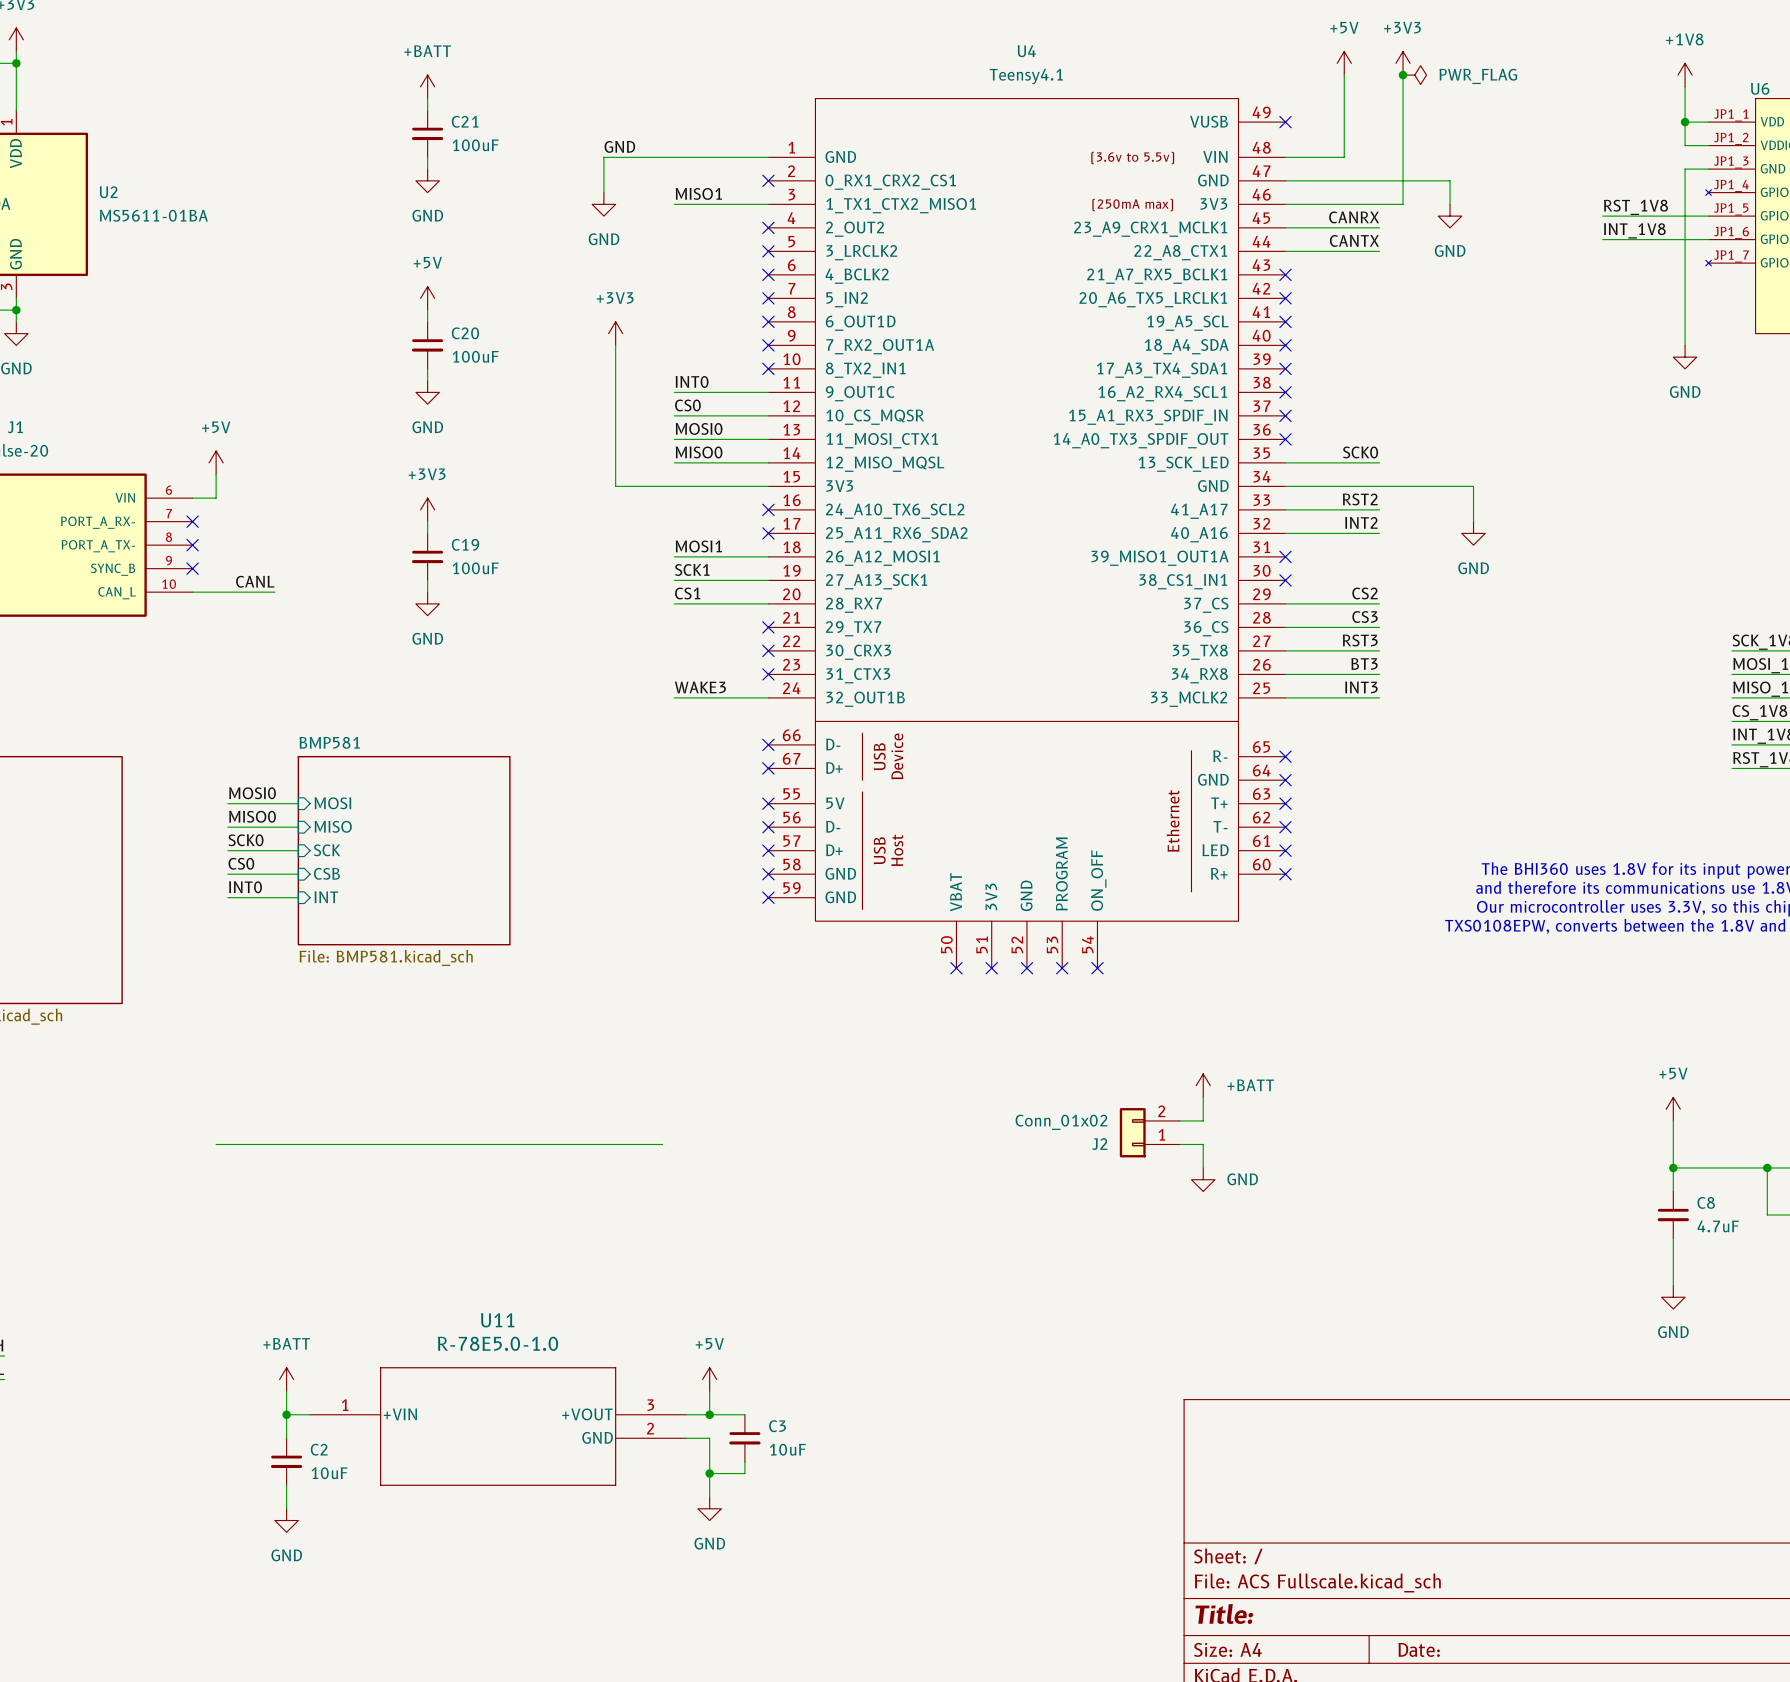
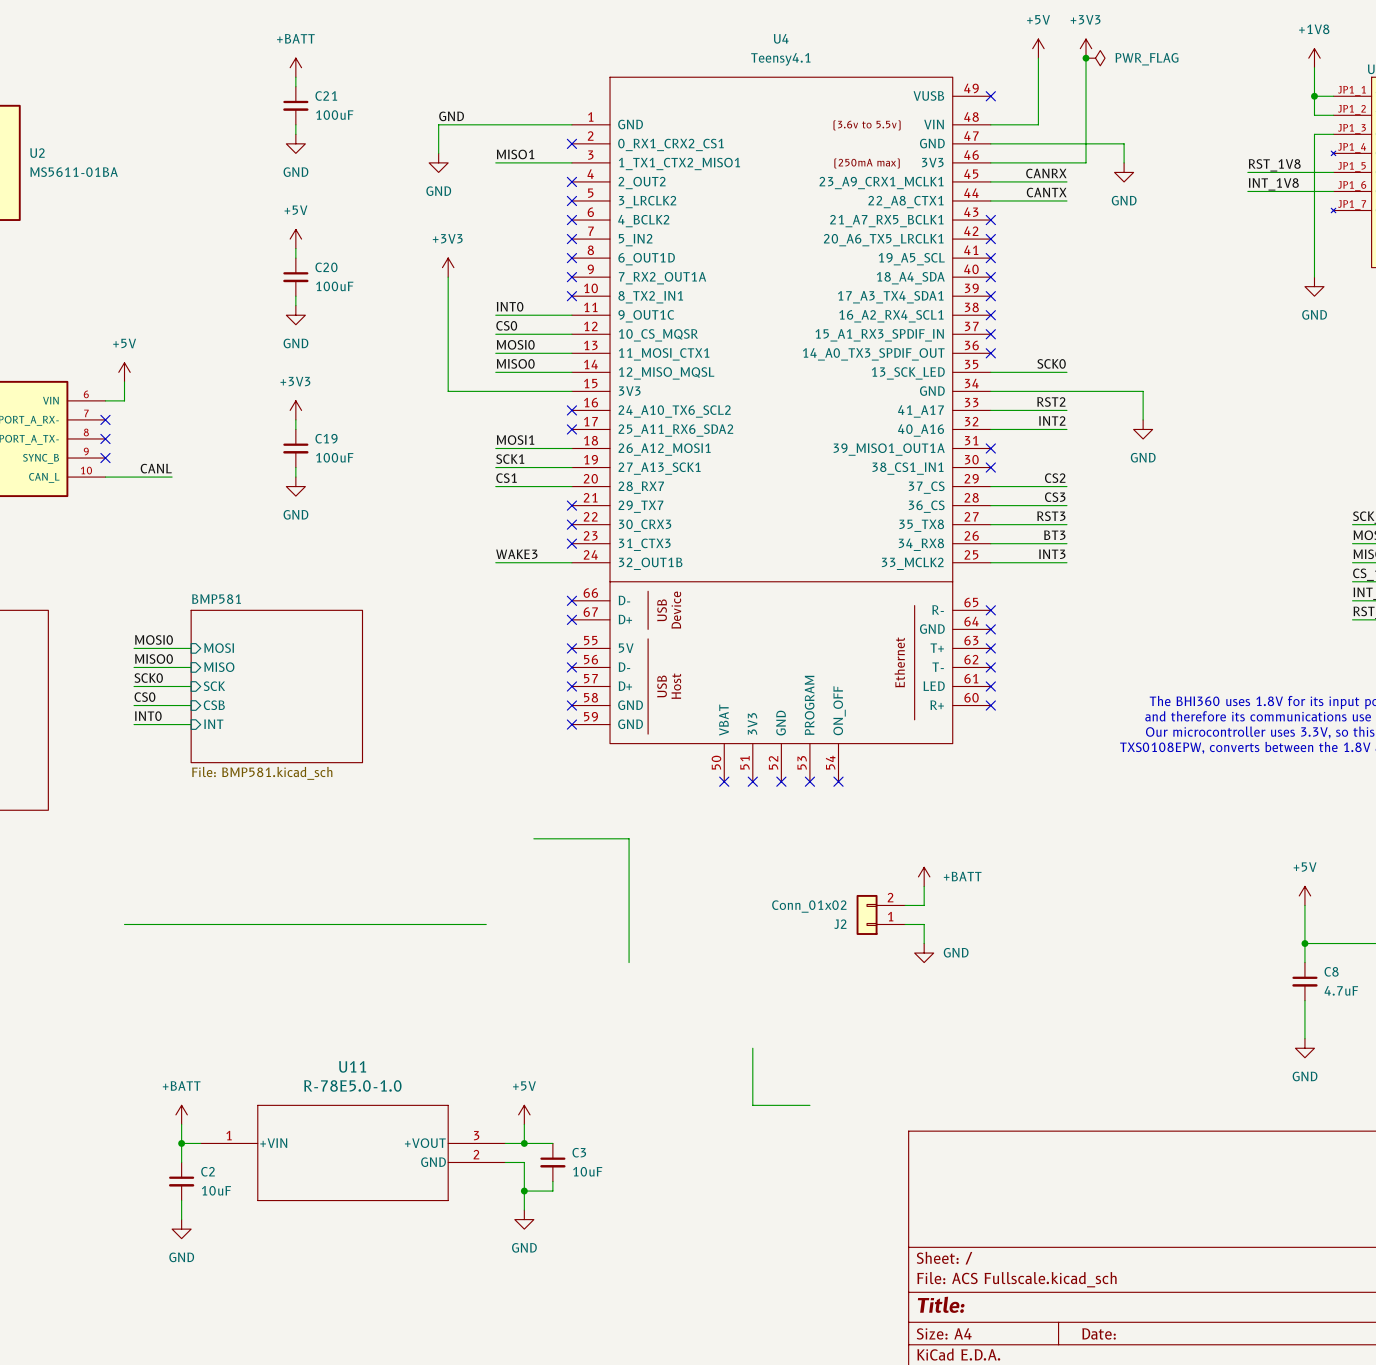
wire: none -> (533, 838) (629, 838) (629, 962)
wire: none -> (752, 1048) (752, 1105) (809, 1105)

